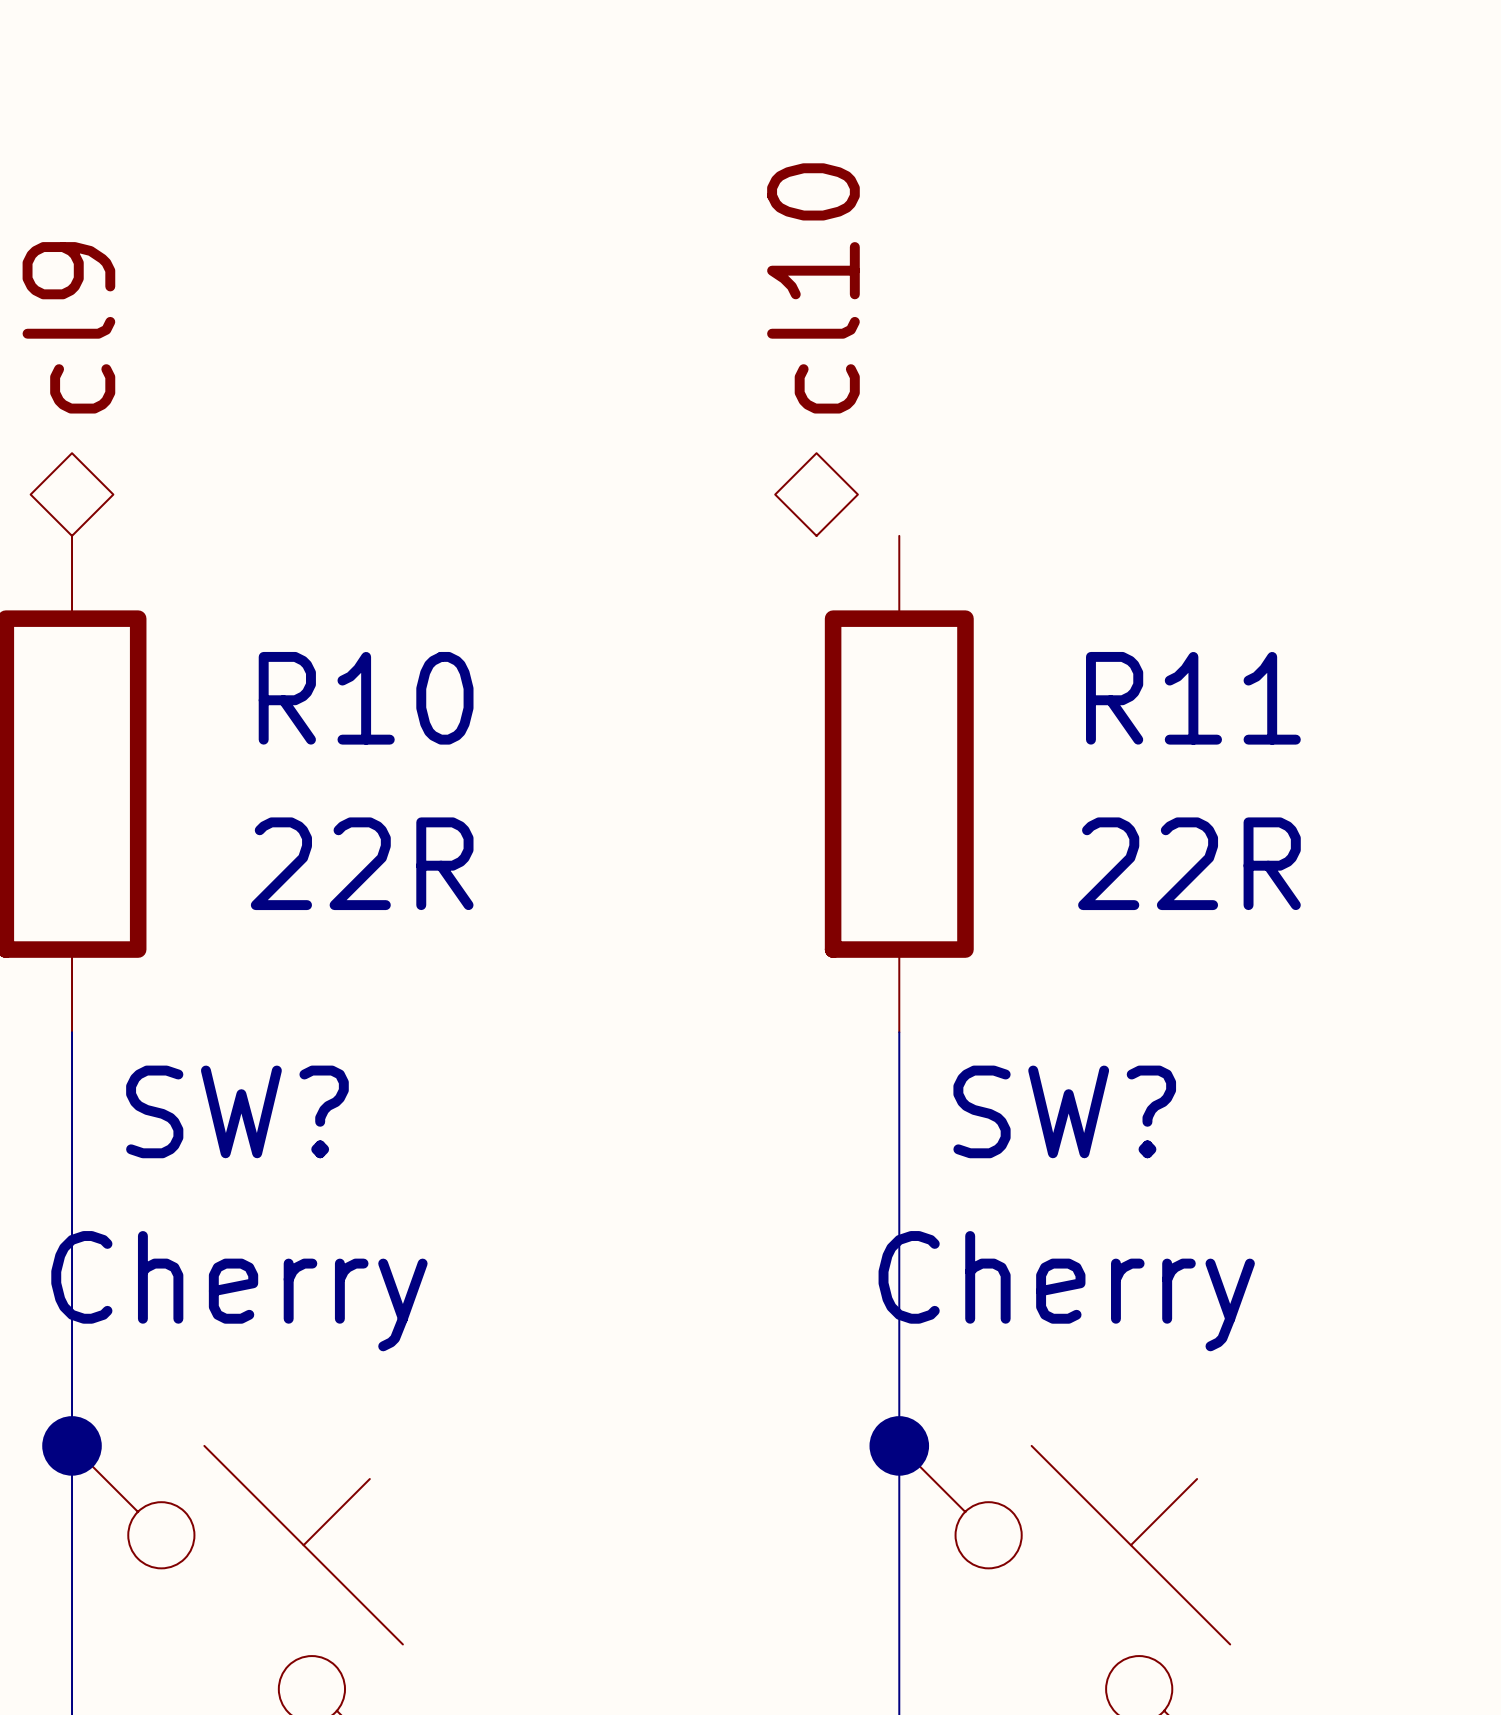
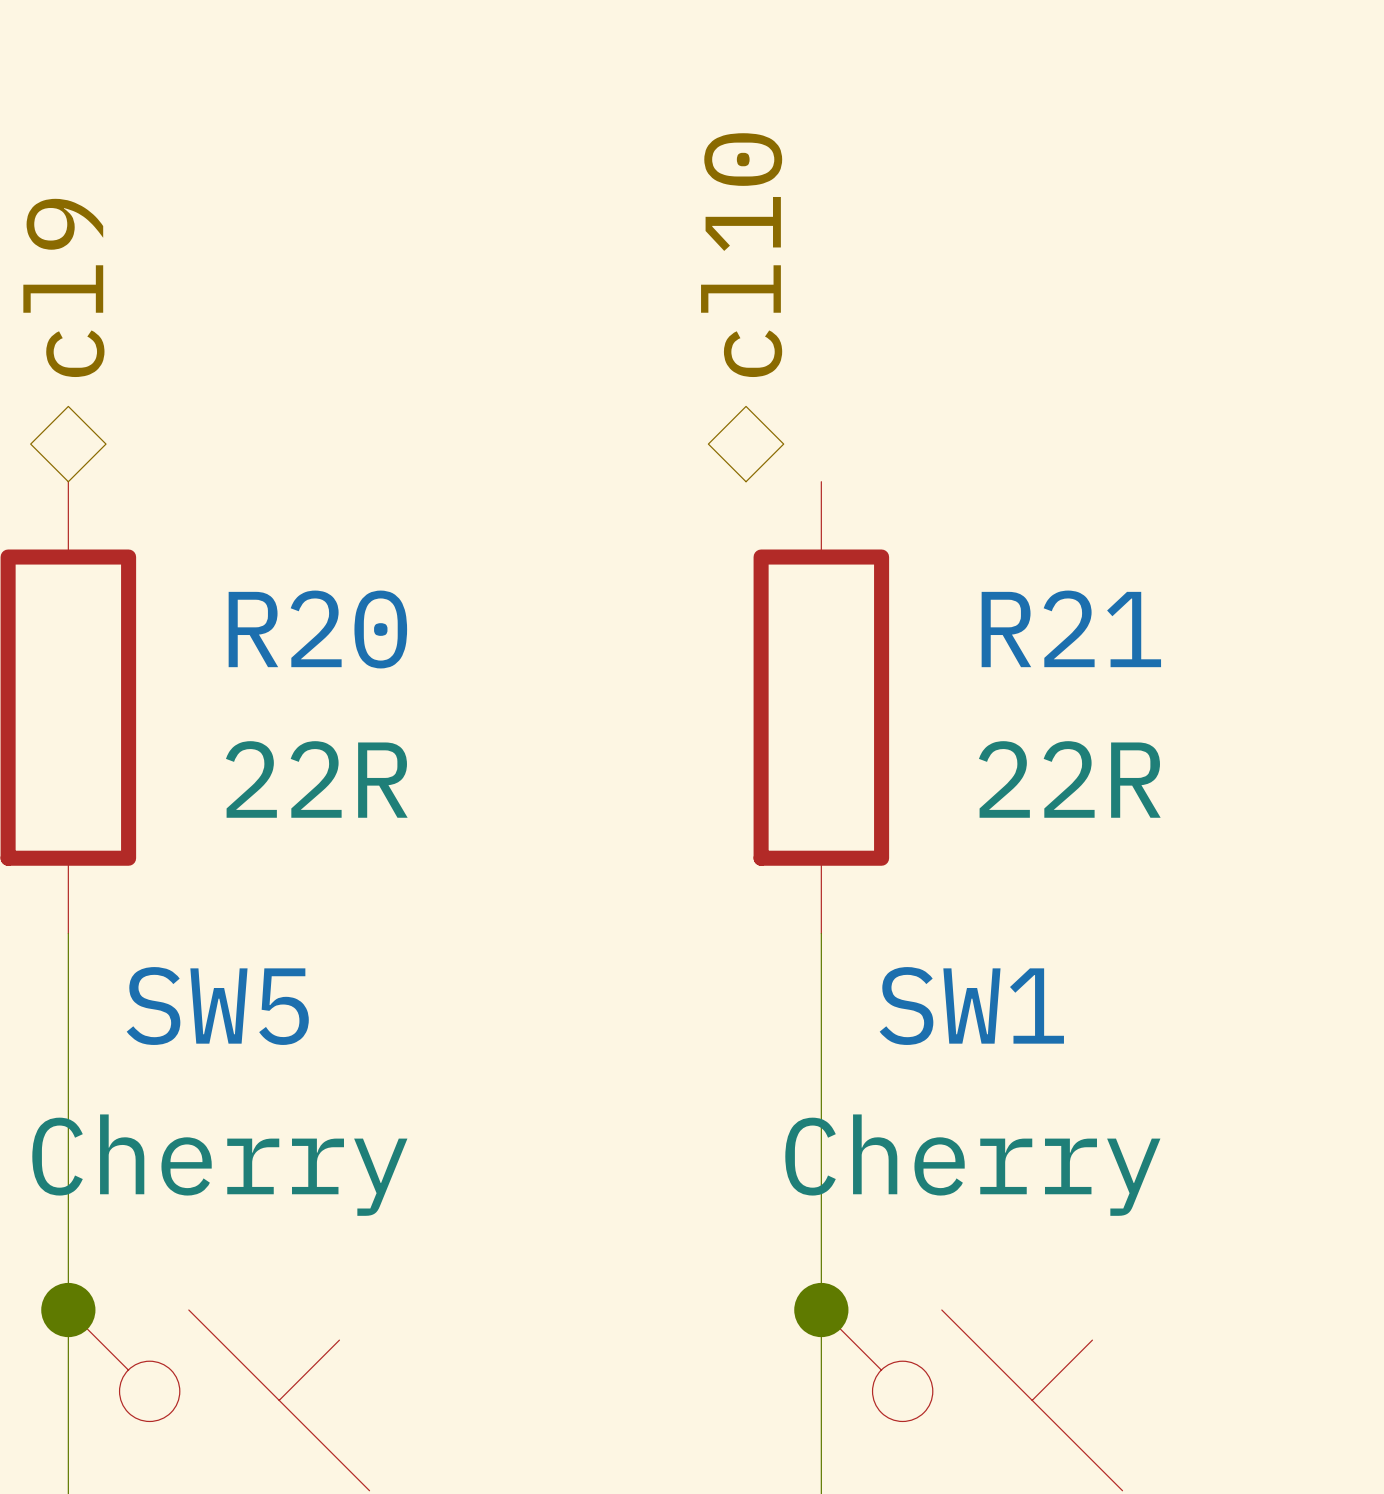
R10 name: R10 (366, 698) -> R20 (317, 629)
R11 name: R11 (1193, 698) -> R21 (1071, 628)
SW? name: SW? (237, 1111) -> SW5 (217, 1006)
SW? name: SW? (1064, 1111) -> SW1 (971, 1006)

